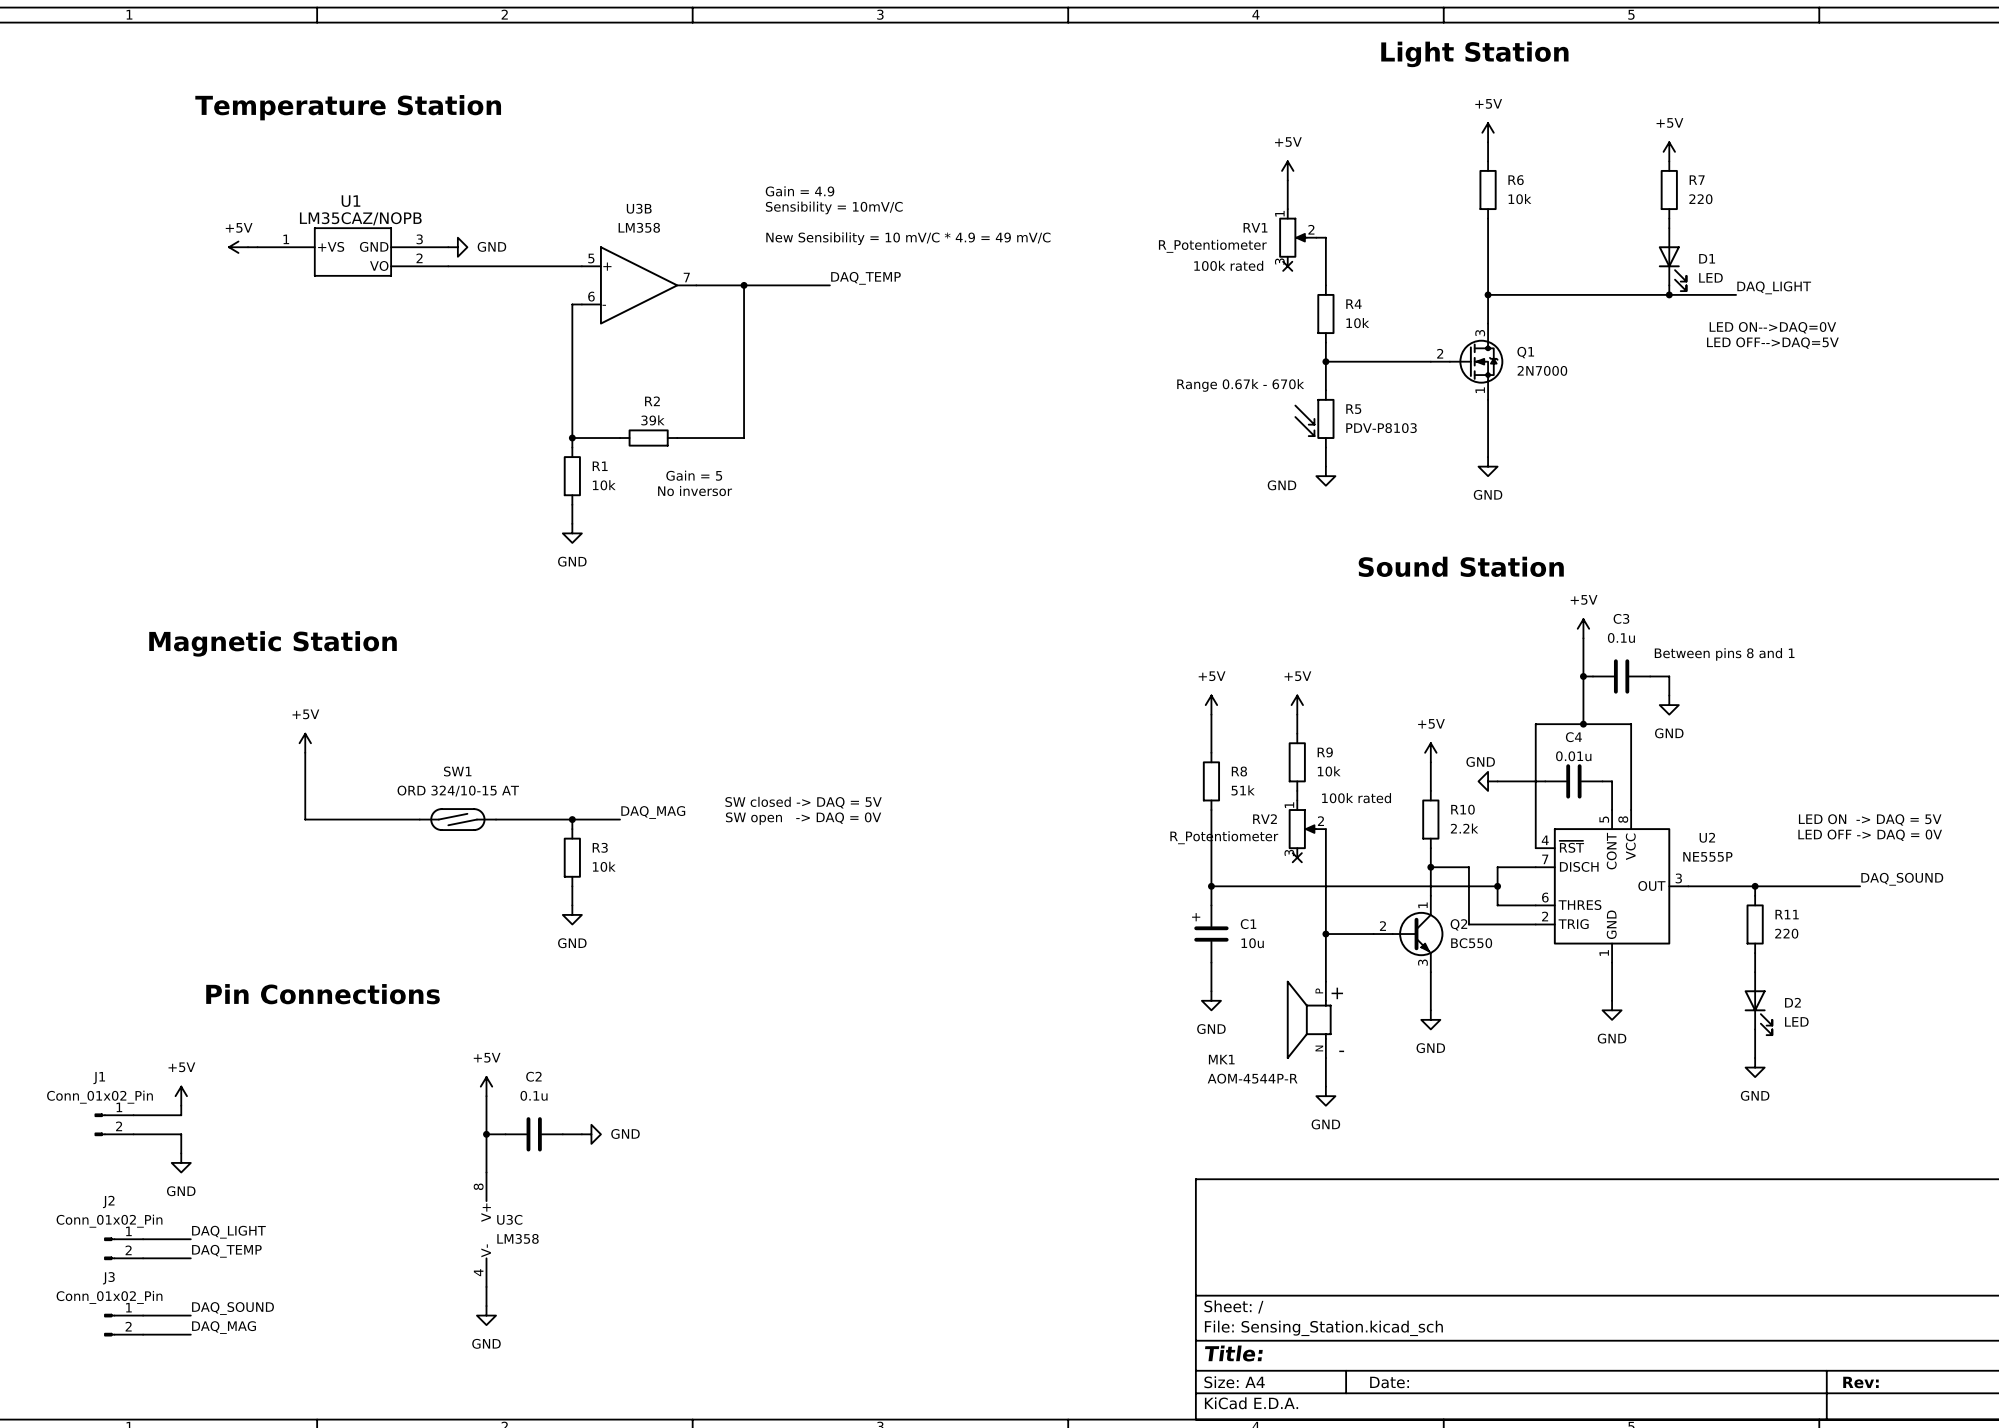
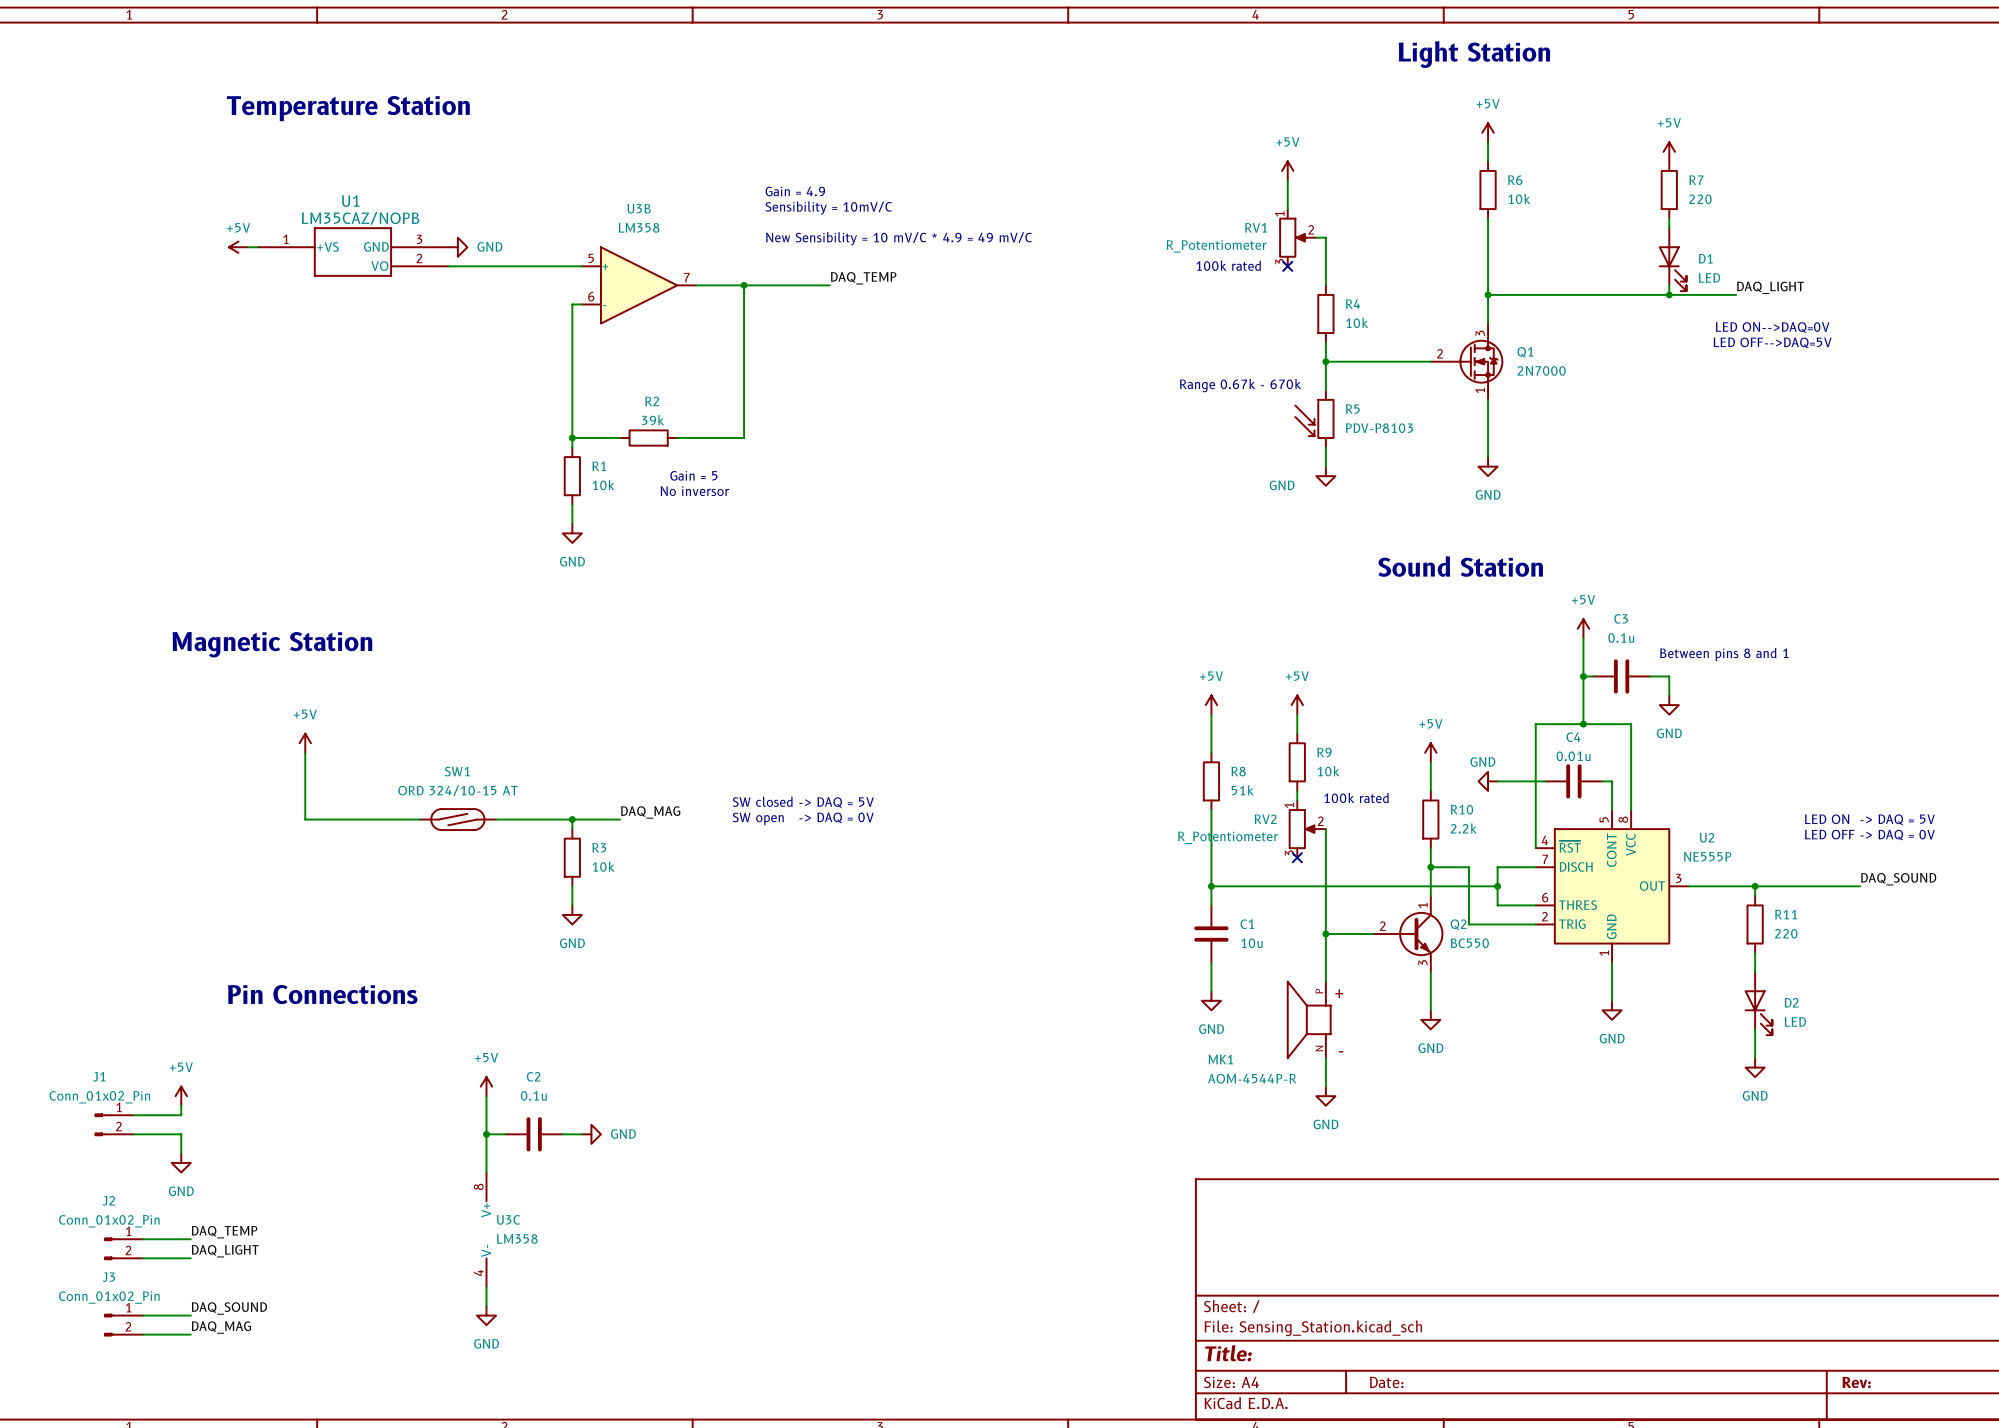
text: + (1196, 917) -> none
label: DAQ_LIGHT (228, 1232) -> DAQ_TEMP (224, 1232)
label: DAQ_TEMP (226, 1251) -> DAQ_LIGHT (225, 1251)

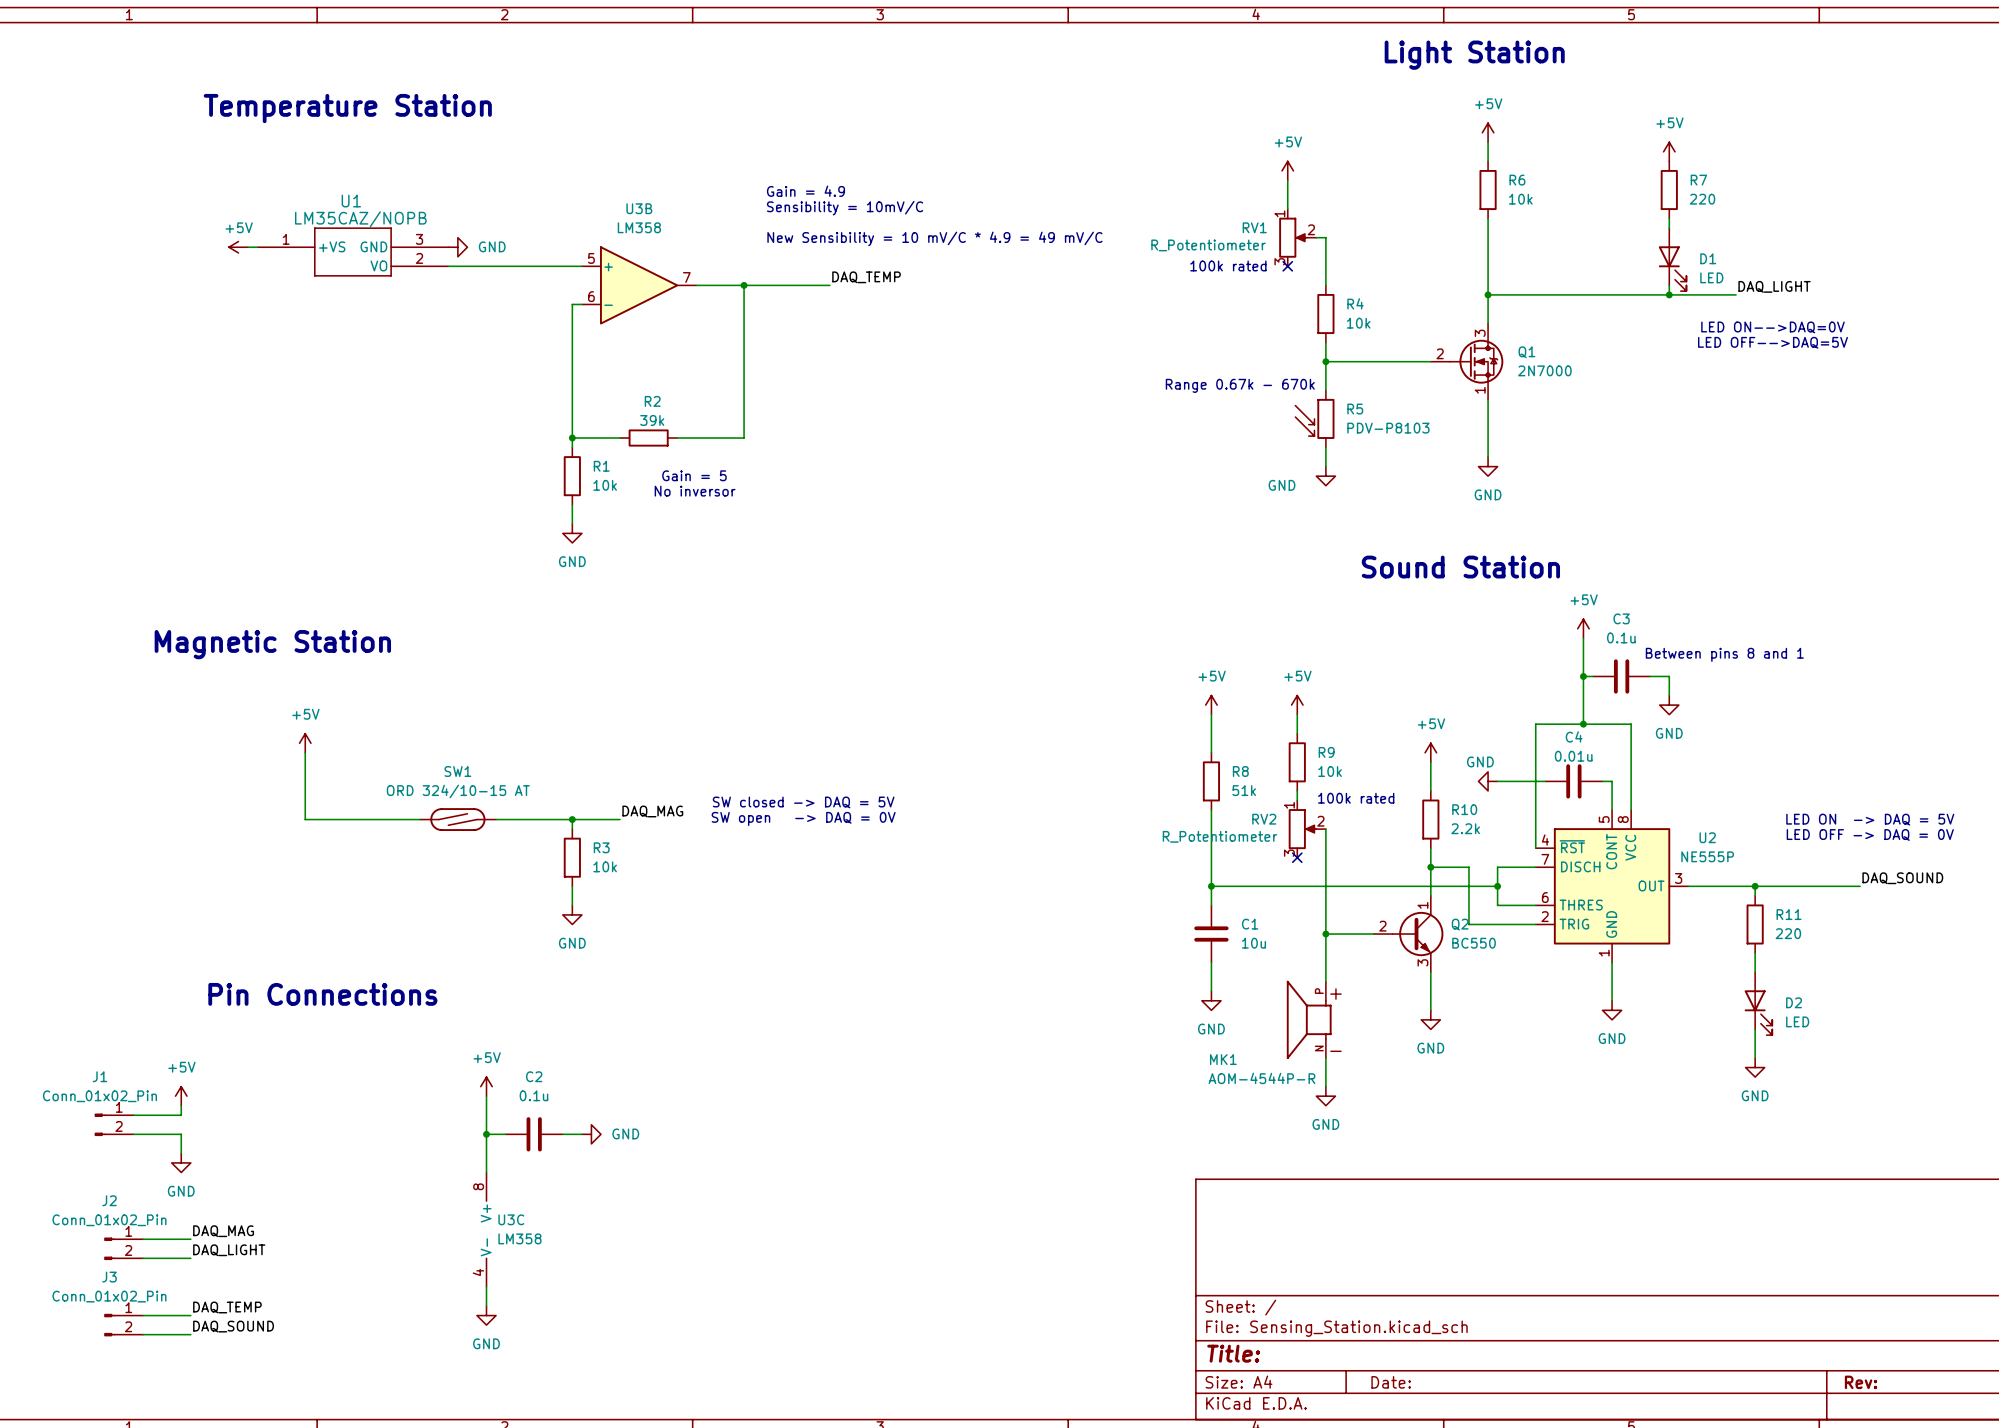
label: DAQ_TEMP (224, 1232) -> DAQ_MAG (223, 1231)
label: DAQ_SOUND (229, 1308) -> DAQ_TEMP (227, 1307)
label: DAQ_MAG (221, 1327) -> DAQ_SOUND (233, 1326)

